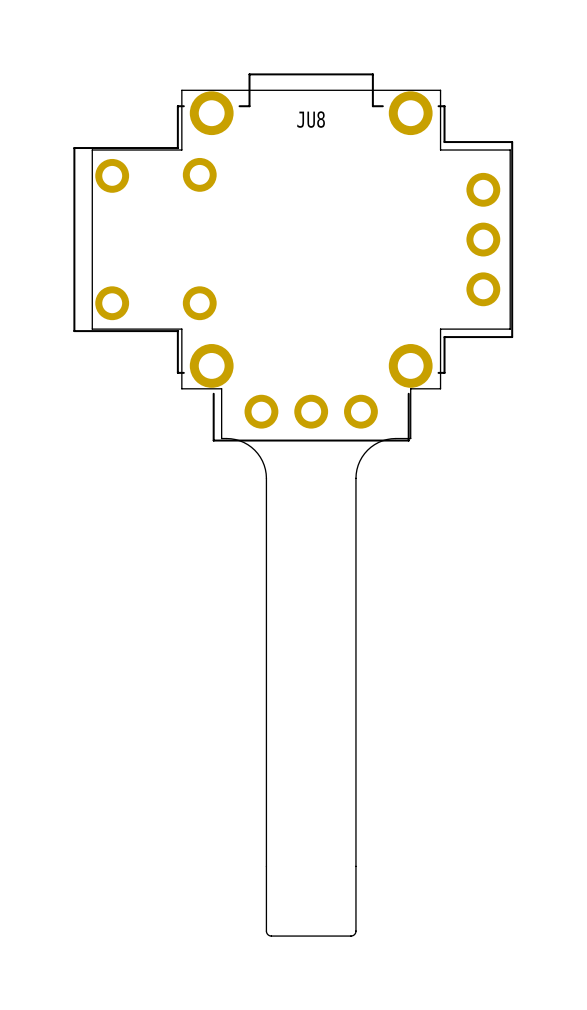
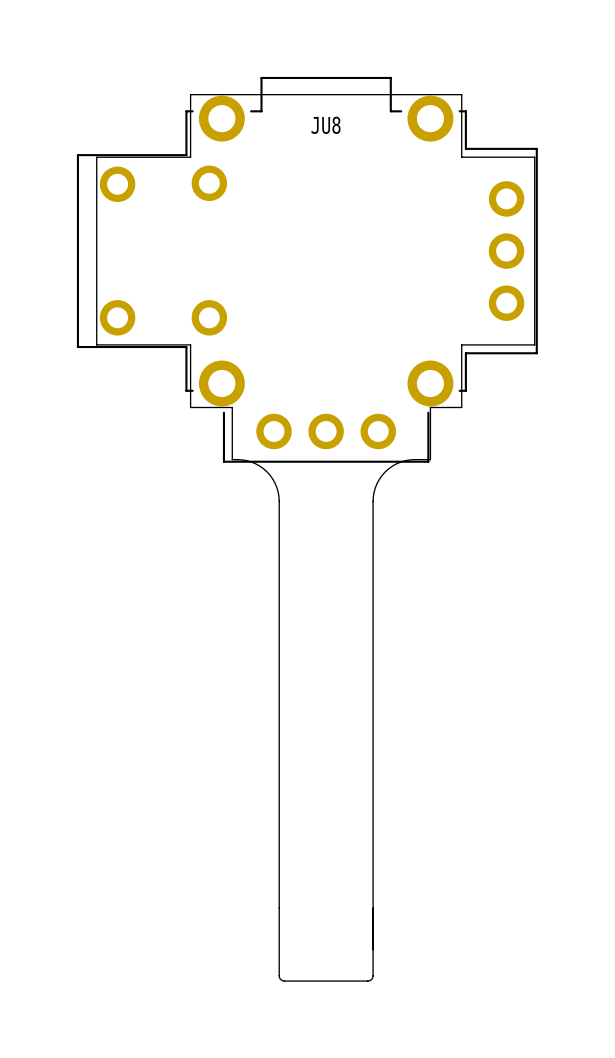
board edge: none -> (373, 908) (373, 949)

